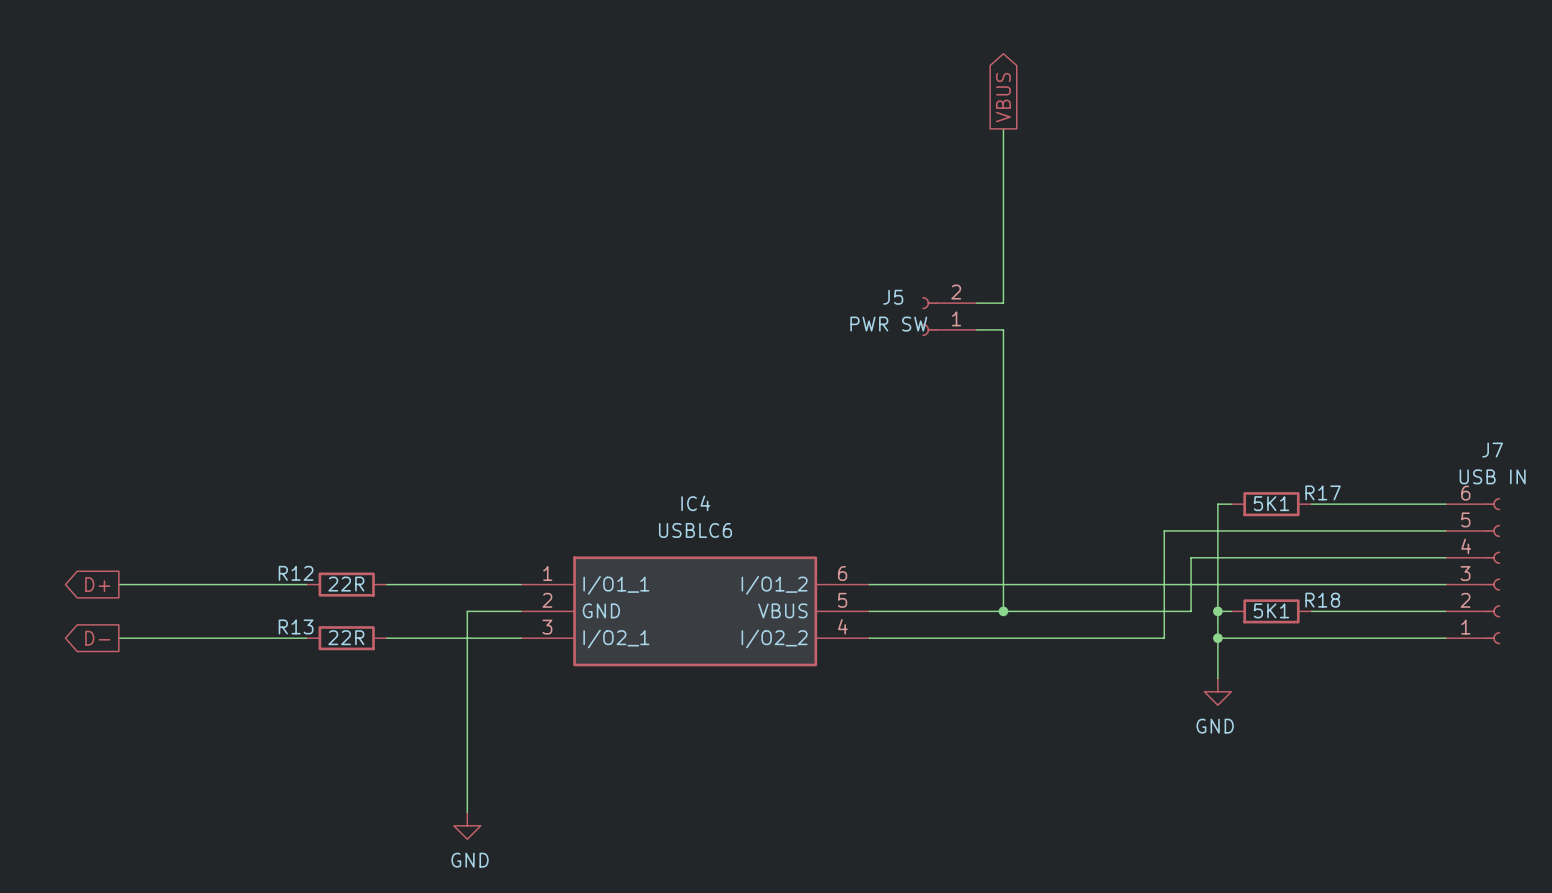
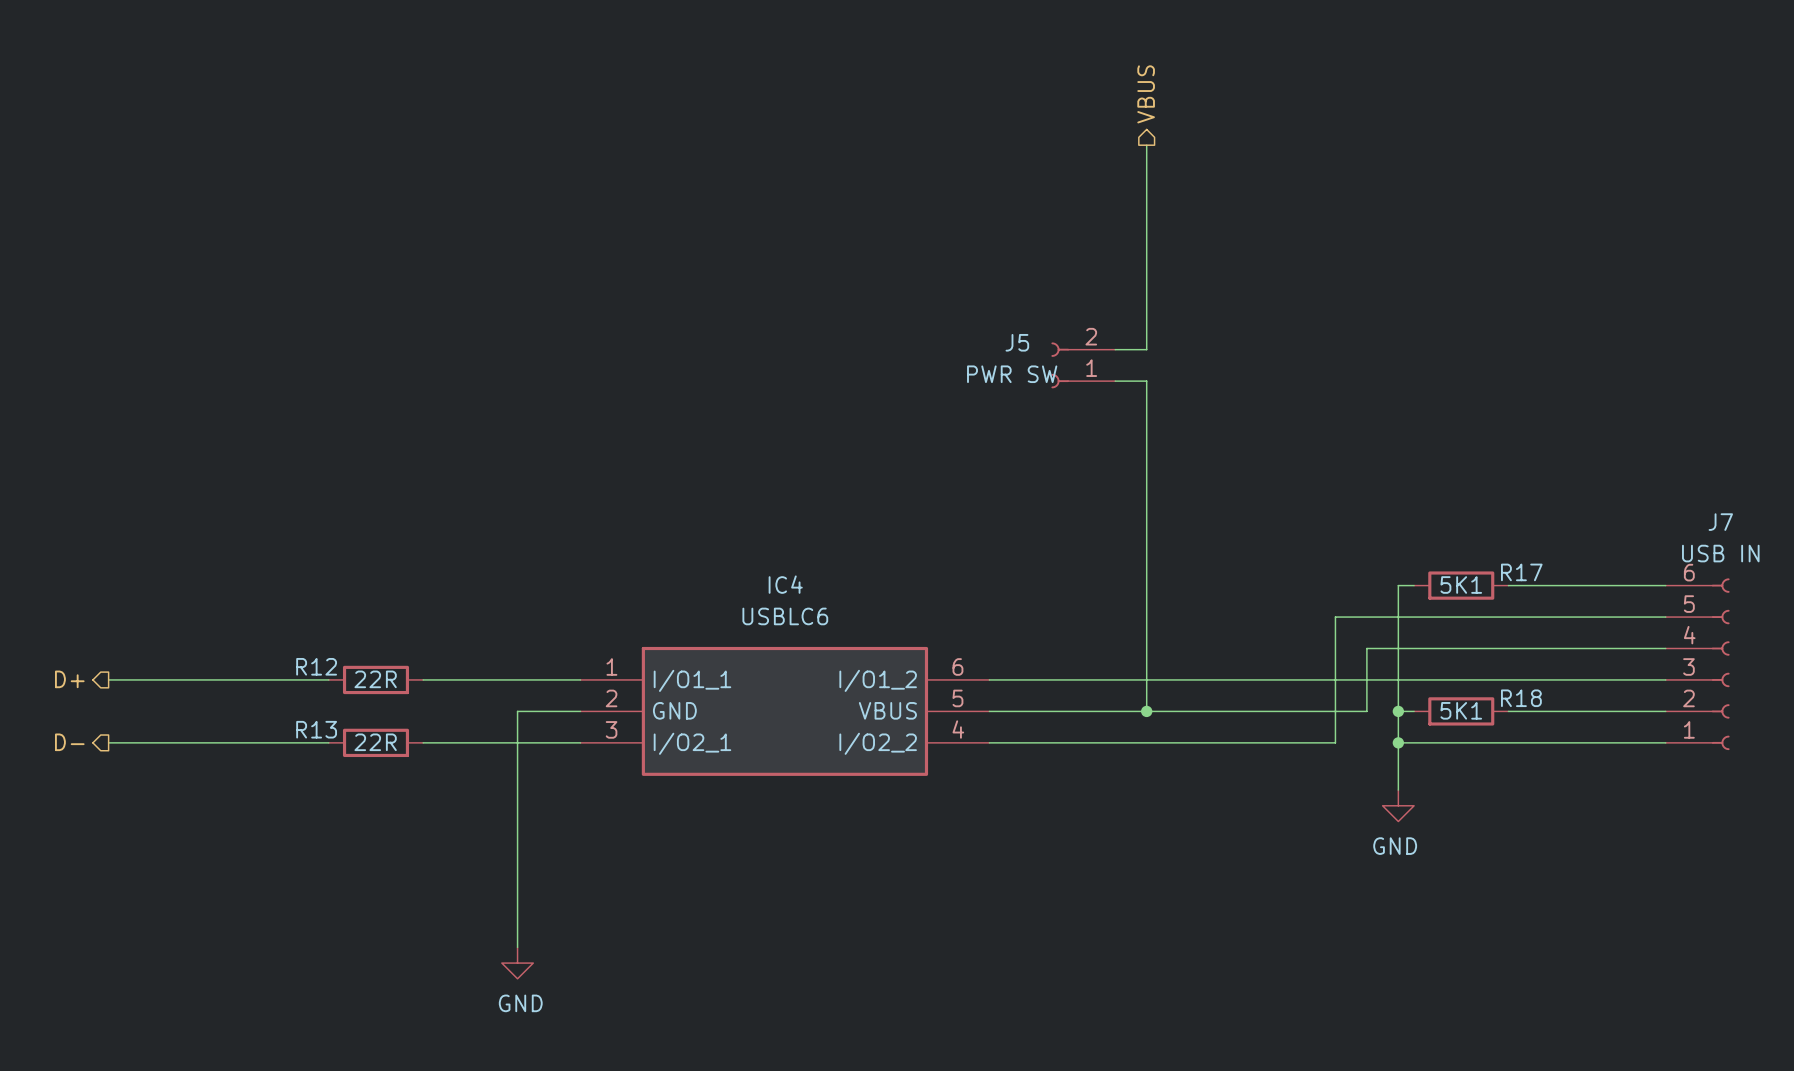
hierarchical label: none -> VBUS (1146, 94)
global label: VBUS (1003, 97) -> none
hierarchical label: none -> D+ (69, 679)
global label: D+ (97, 584) -> none
hierarchical label: none -> D- (69, 742)
global label: D- (97, 638) -> none

